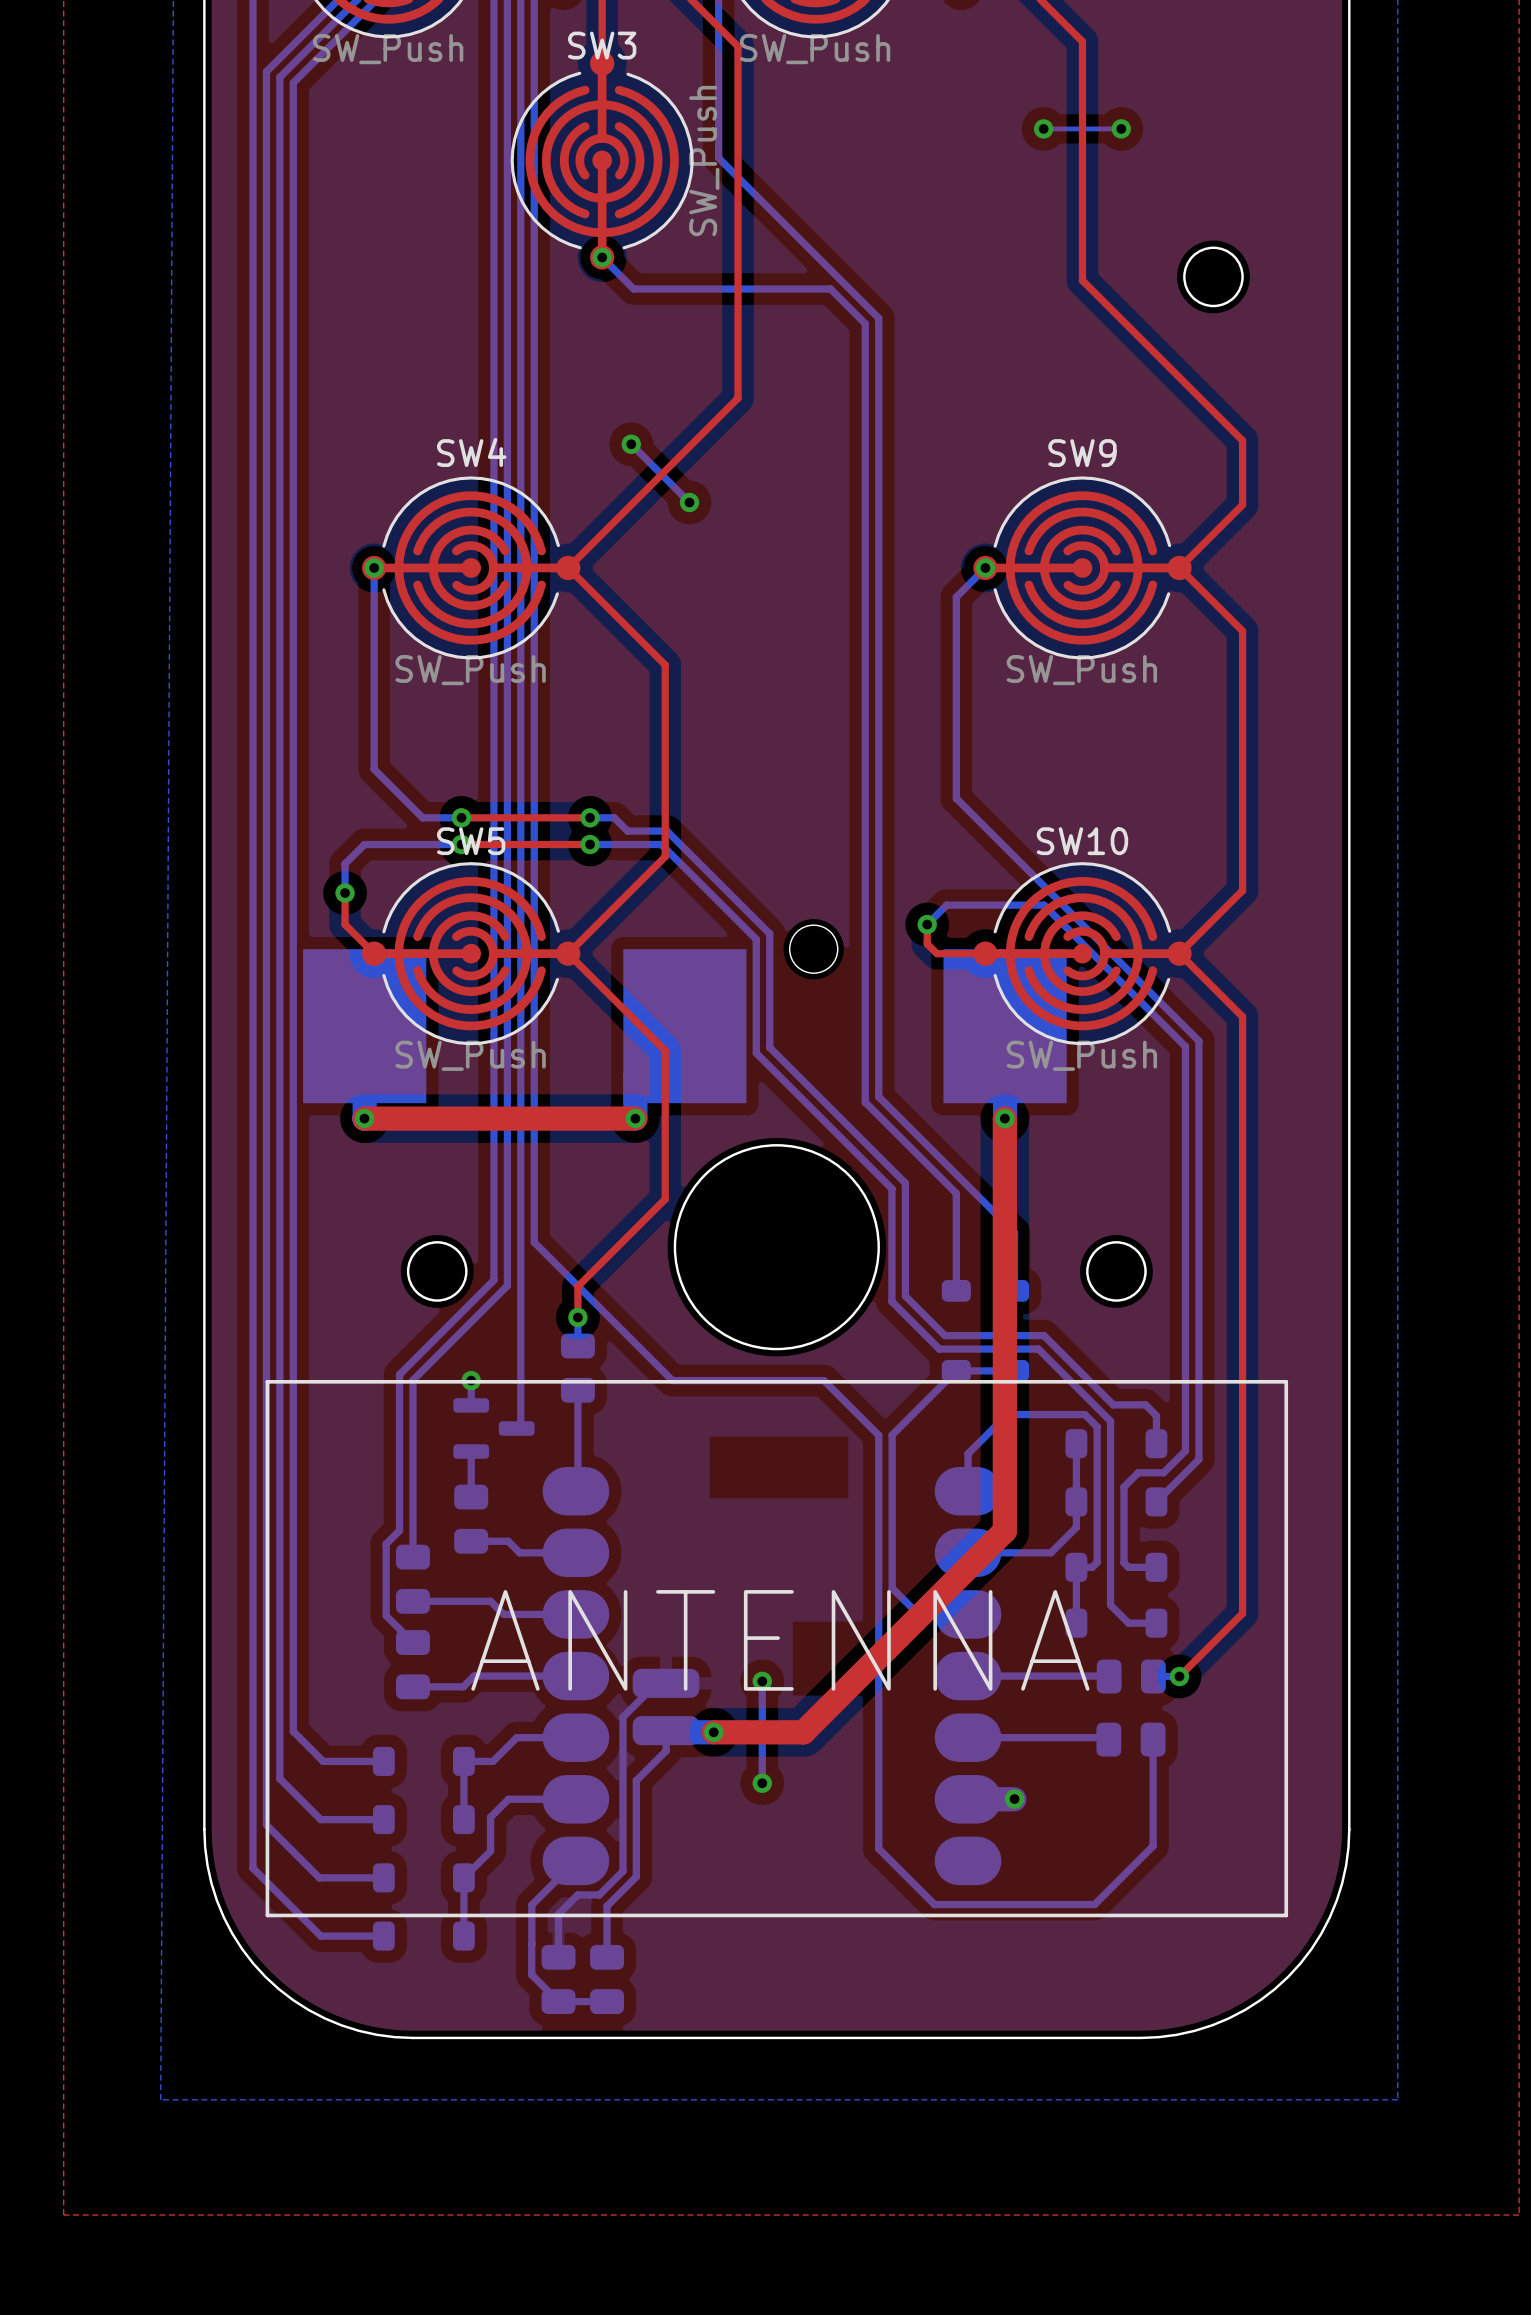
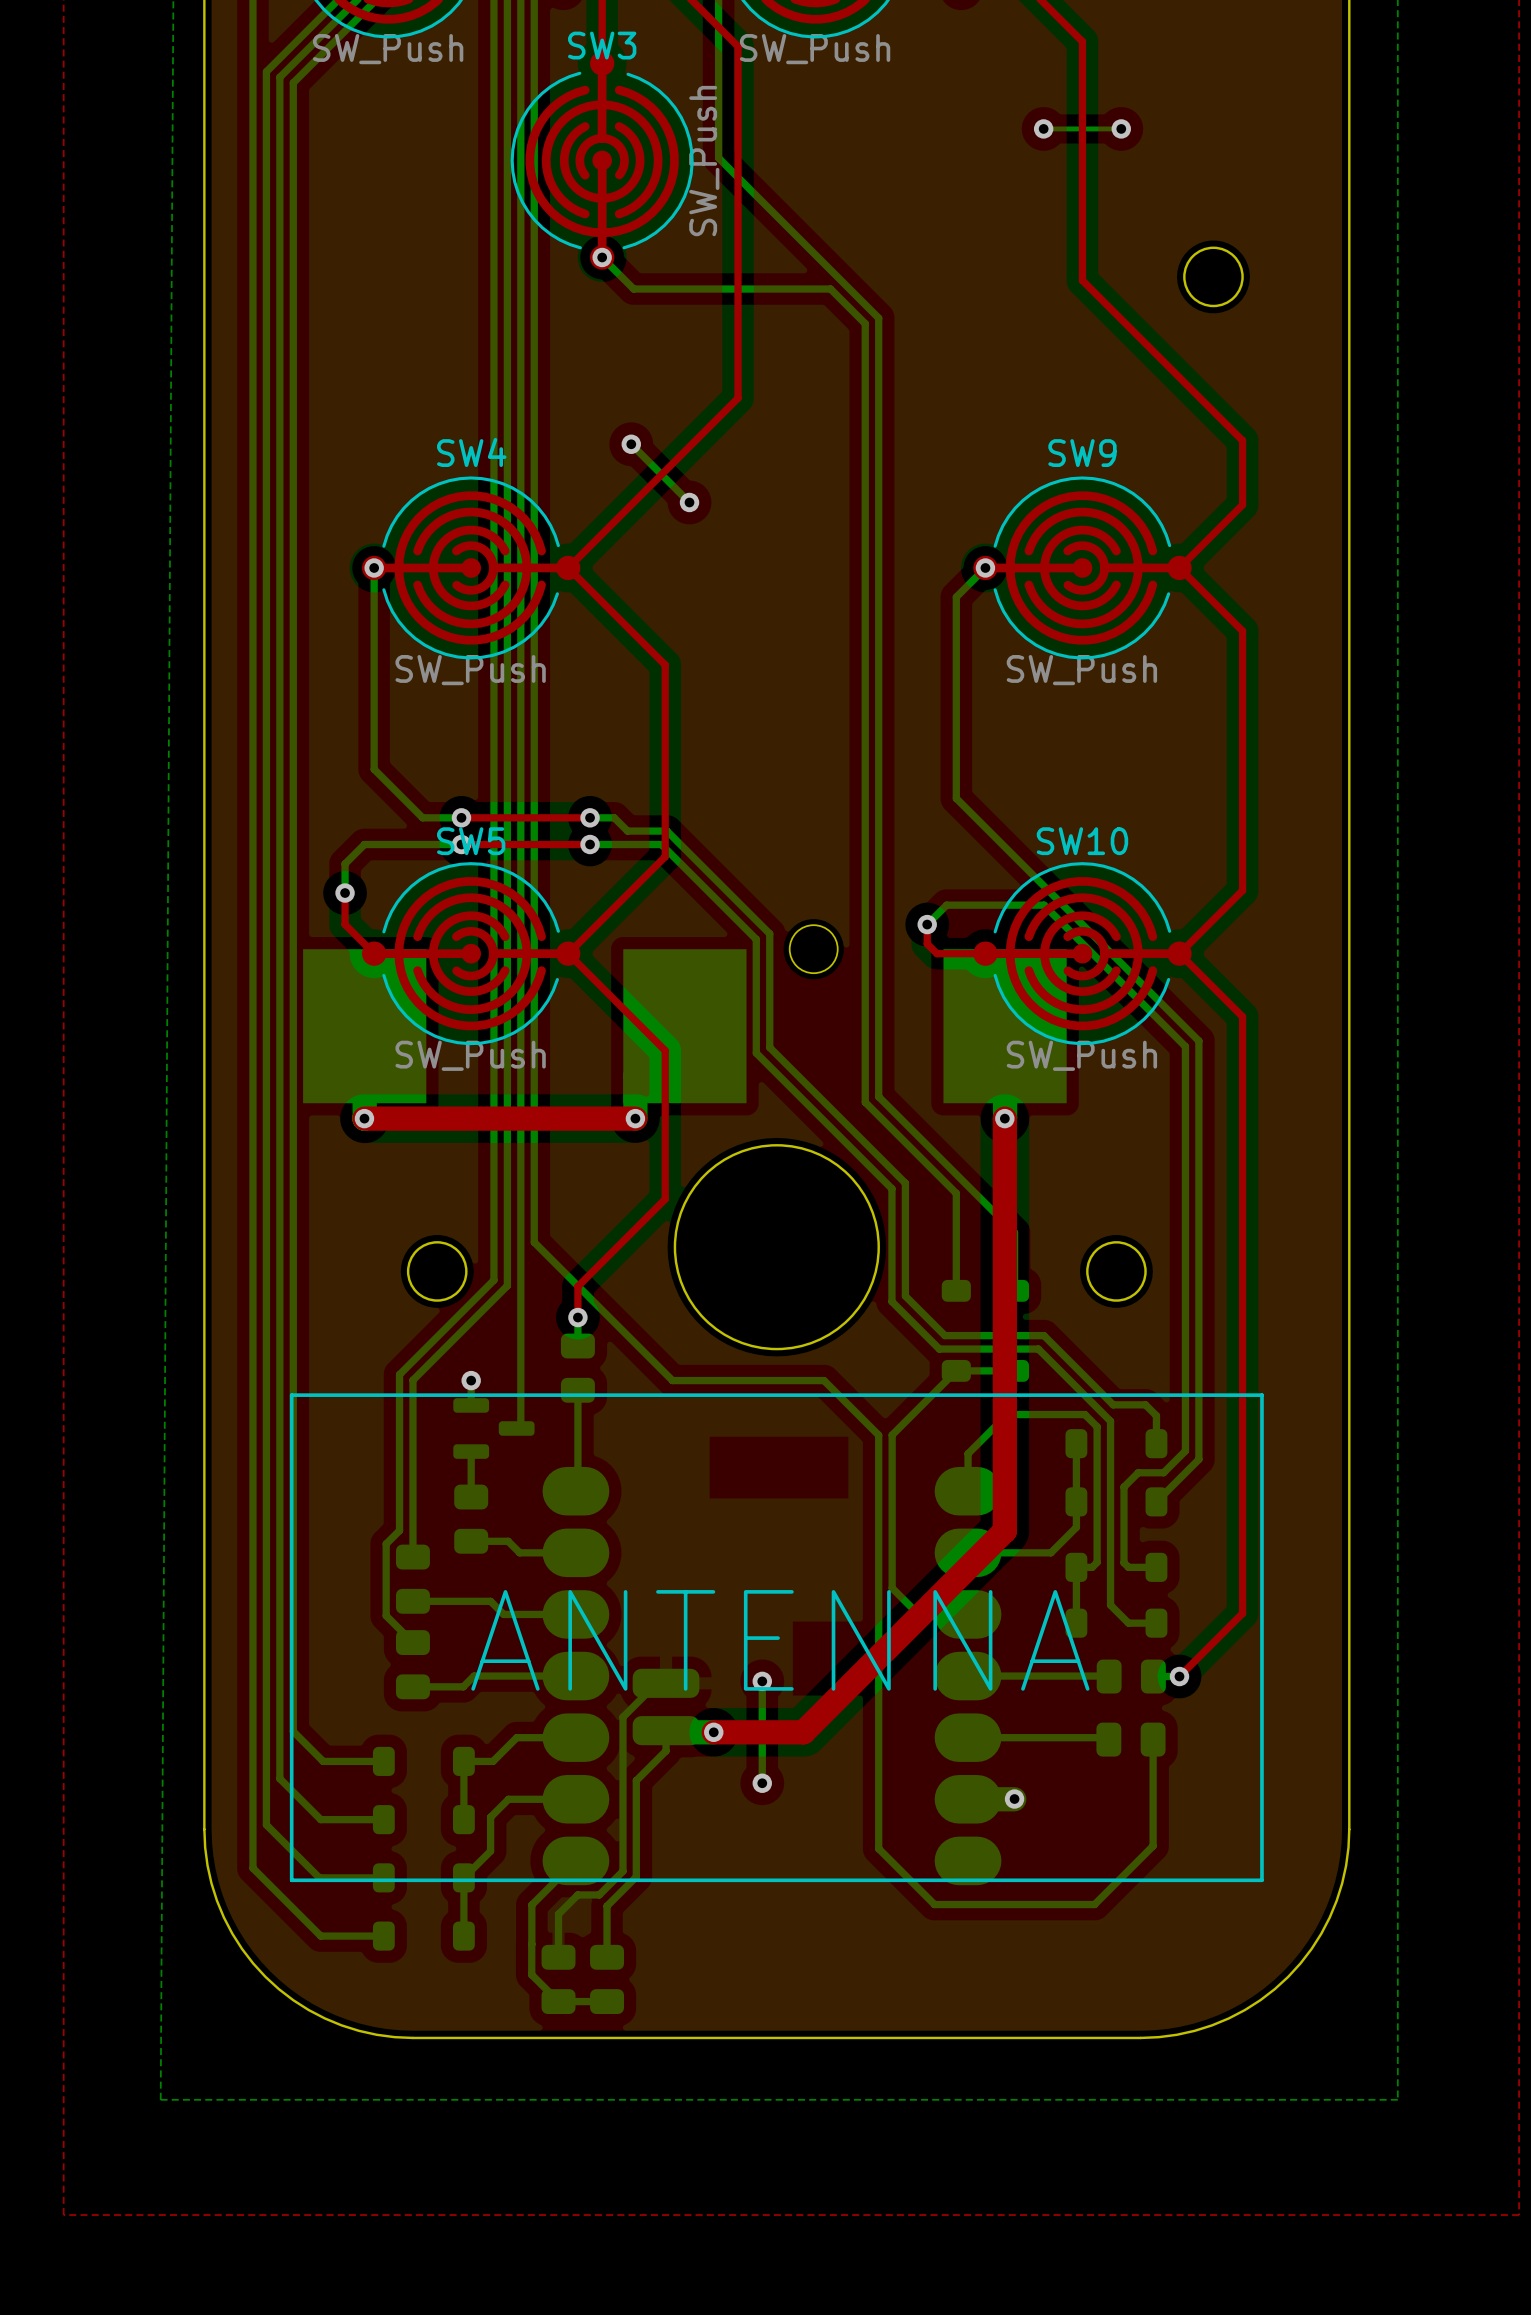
line: (267, 1381) (1286, 1381) (1286, 1915) (267, 1915) (267, 1381) -> (291, 1395) (291, 1880) (1261, 1880) (1261, 1395) (291, 1395)

